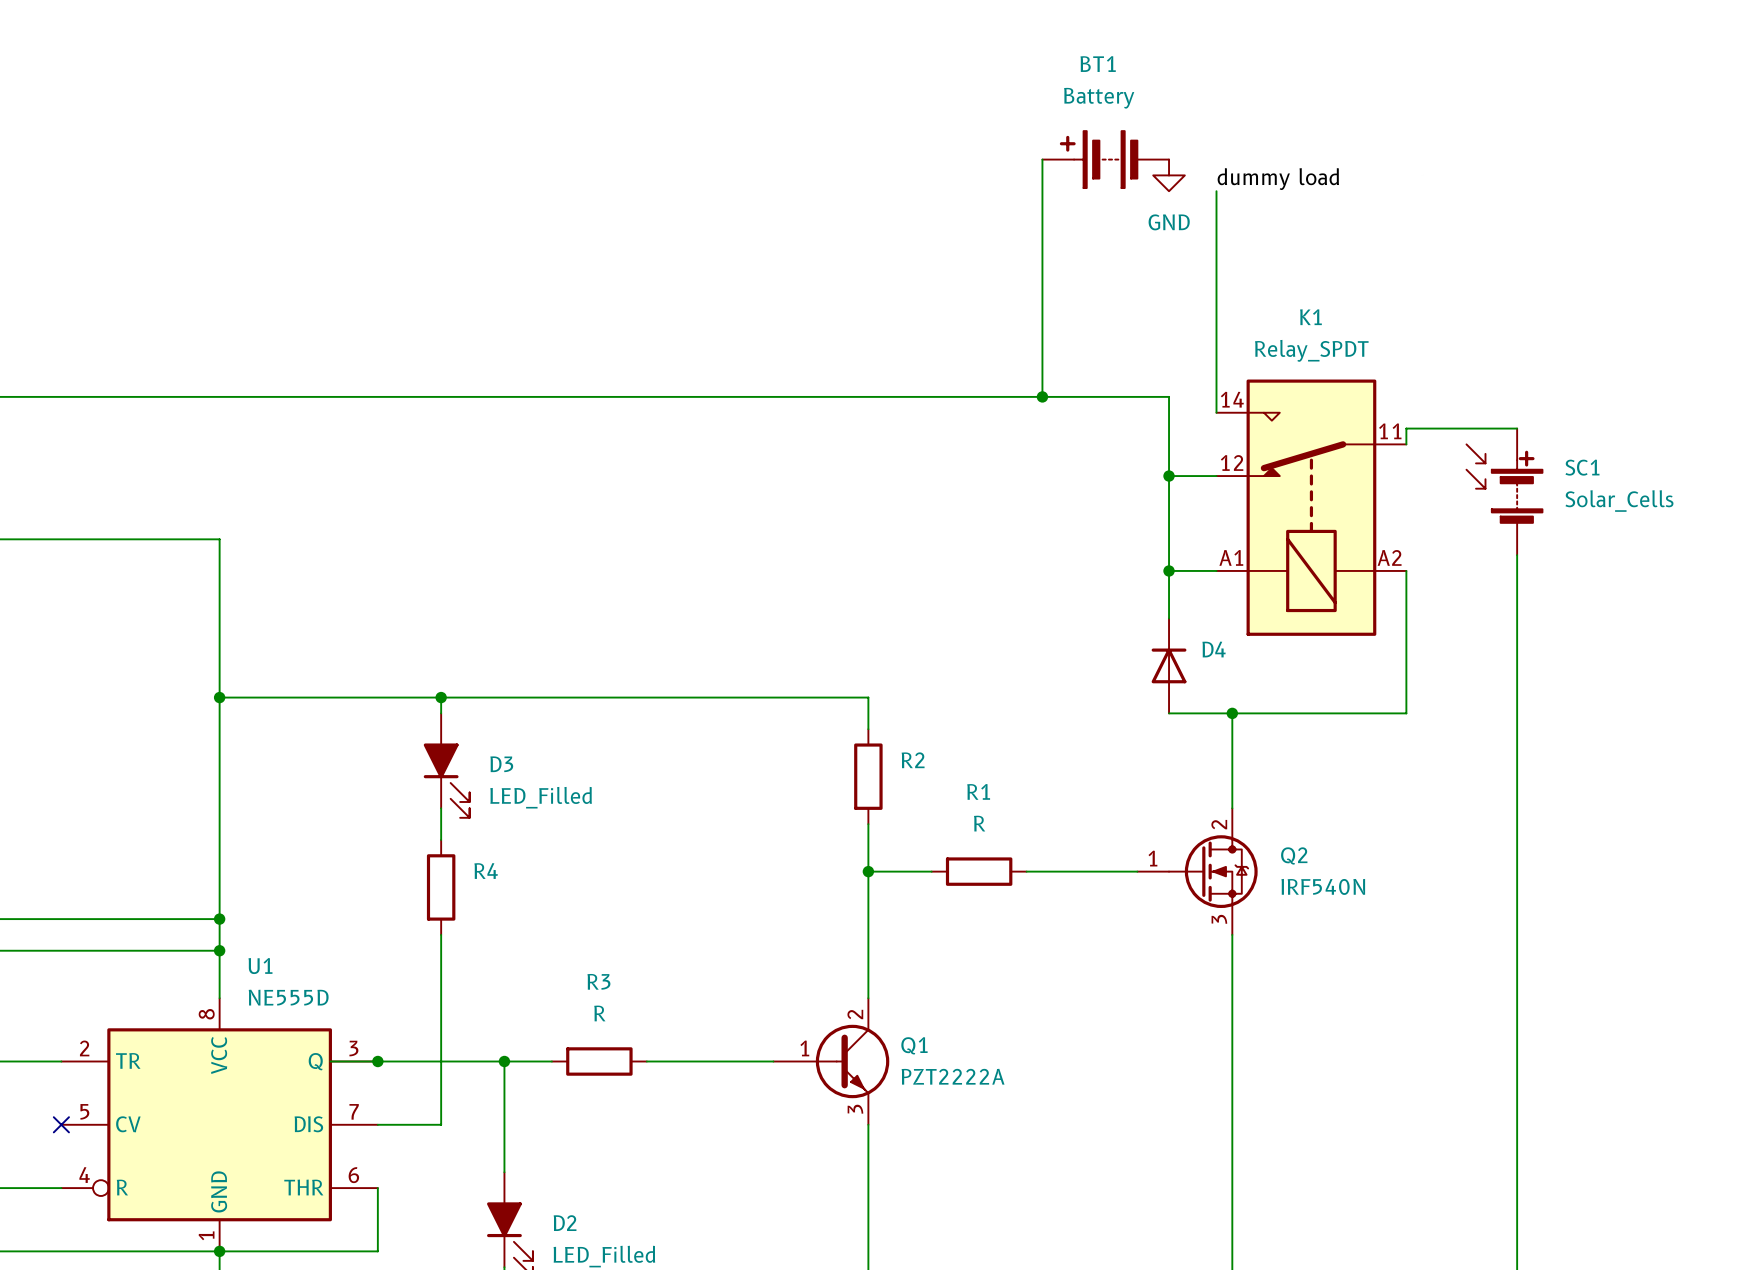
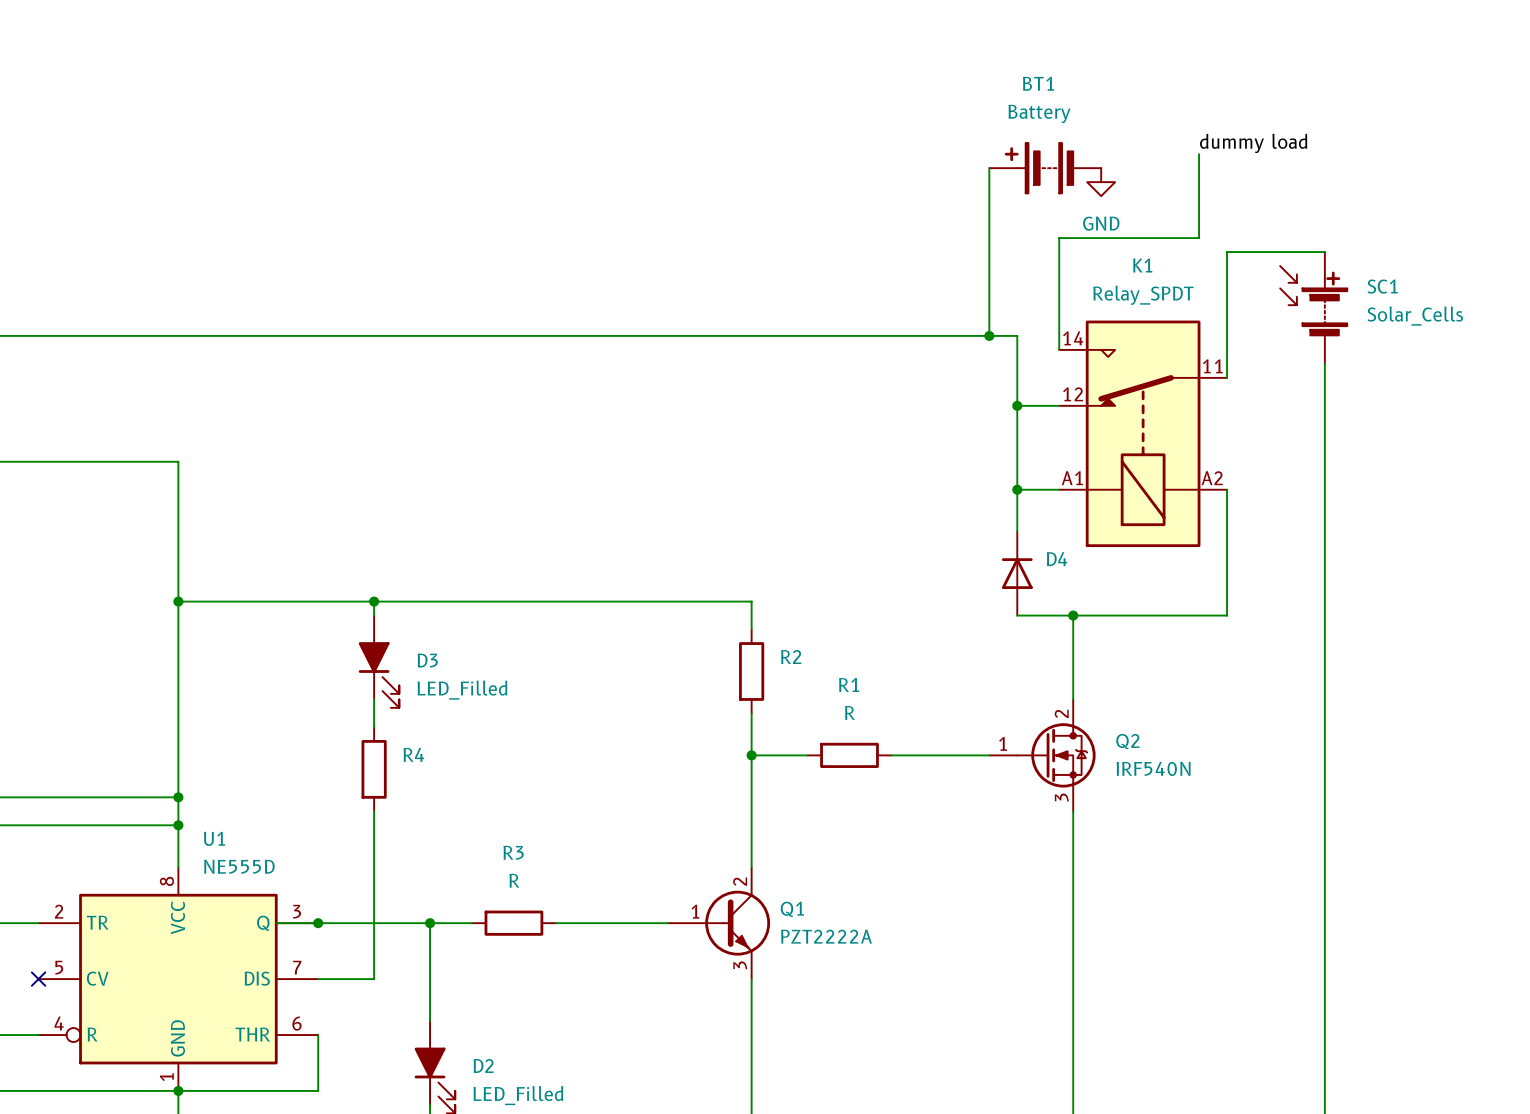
wire: (1042, 159) (1042, 396) -> none
BT1 position: (1105, 159) -> (1045, 168)
power symbol position: GND (1169, 175) -> GND (1101, 182)
label position: dummy load (1278, 179) -> dummy load (1253, 143)
wire: (1216, 191) (1216, 286) -> (1199, 154) (1199, 238) (1059, 238)
wire: none -> (989, 168) (989, 335)
junction: (1042, 396) -> none
junction: none -> (989, 335)
wire: (1406, 428) (1517, 428) -> (1227, 363) (1227, 252) (1324, 252)
SC1 position: (1504, 491) -> (1313, 307)

